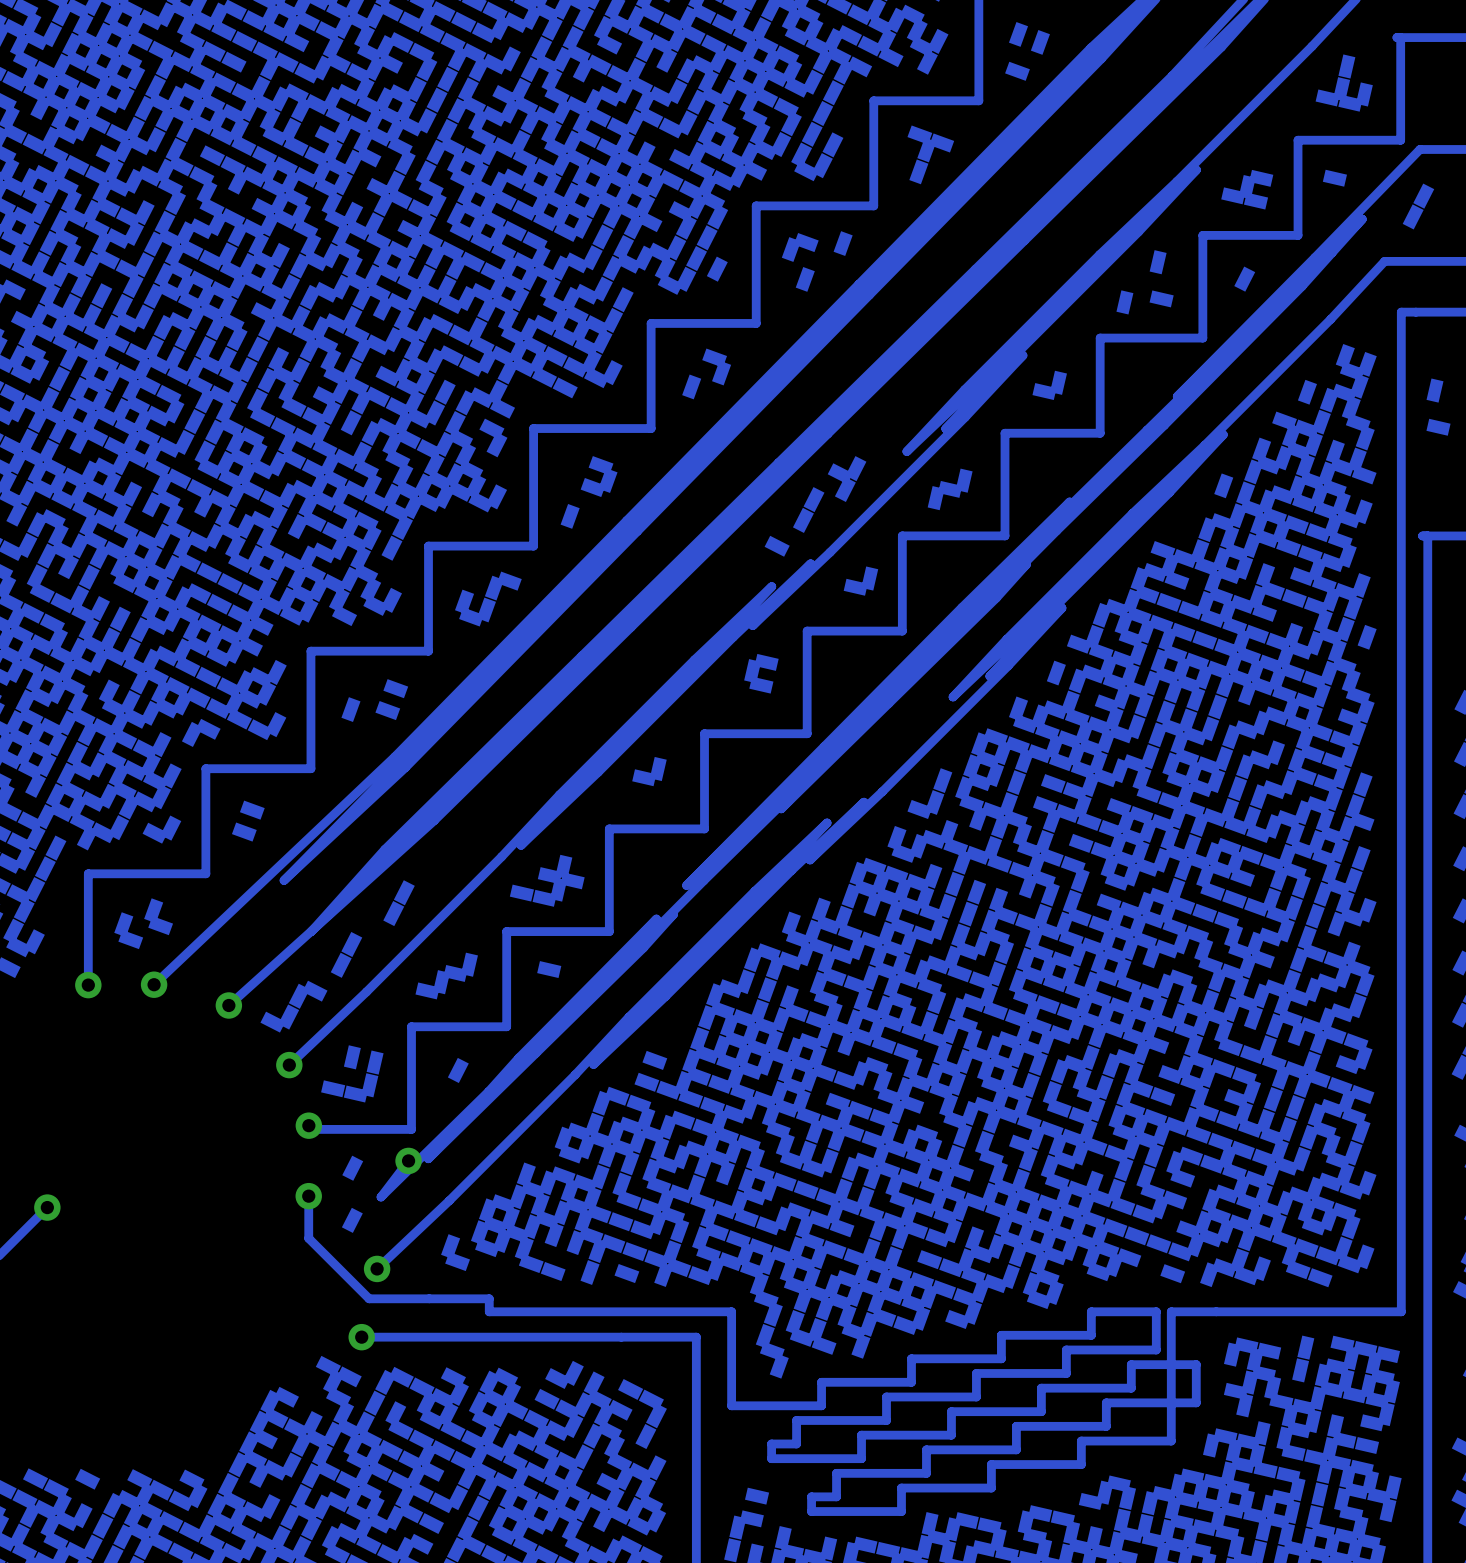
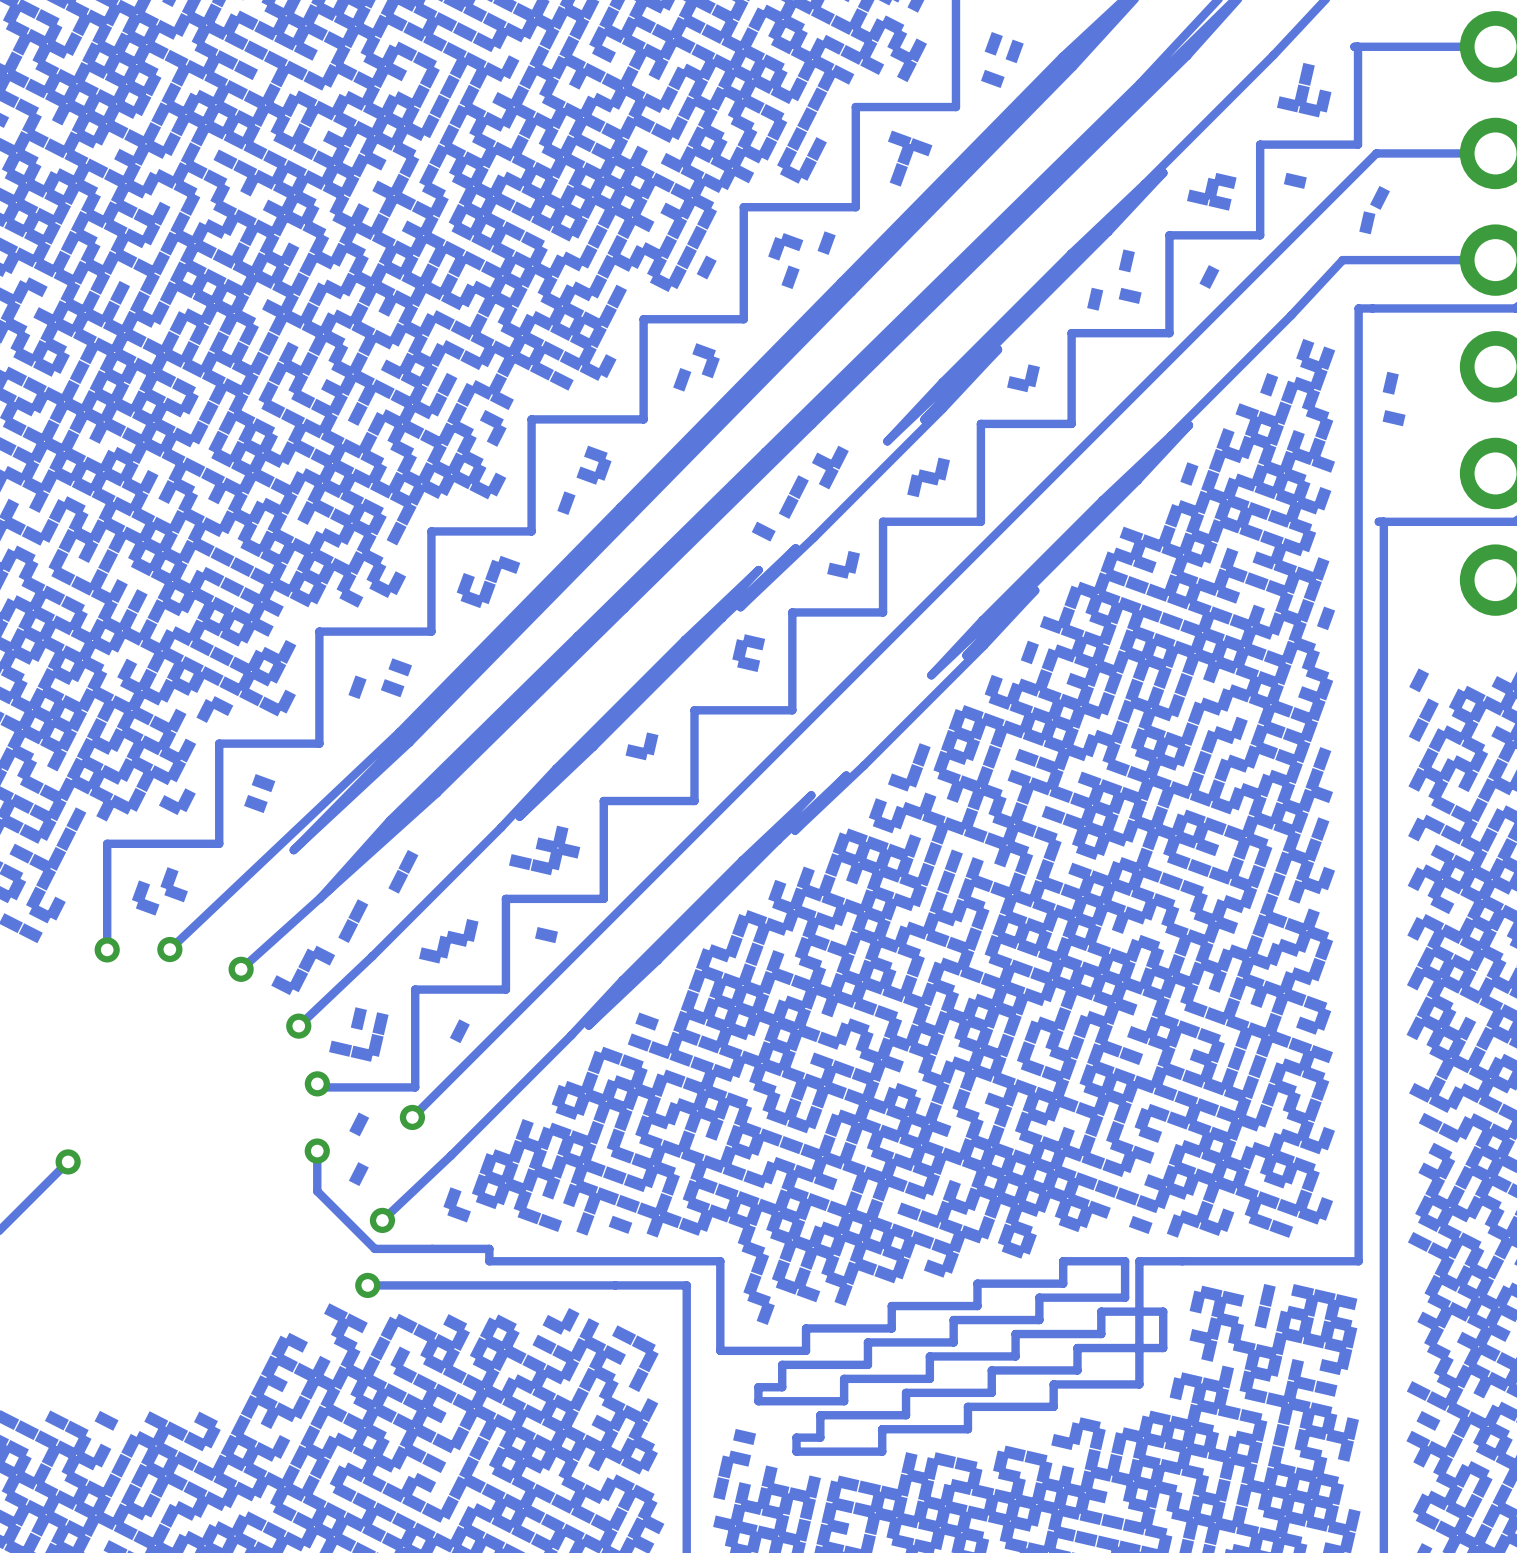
track: (1420, 149) (1177, 396) (1284, 291) (1254, 324) (1039, 535) (1069, 501) (962, 607) (686, 885) (931, 640) (901, 674) (764, 813) (733, 847) (949, 636) (979, 602) (871, 708) (1116, 463) (1086, 497) (1194, 391) (1224, 358) (1362, 219) (1302, 286) (918, 669) (1026, 564) (996, 597) (781, 808) (811, 775) (703, 880) (566, 1019) (673, 914) (643, 947) (428, 1158) (458, 1125) (596, 986) (656, 919) (518, 1058) (488, 1091) (381, 1197) (408, 1160) -> (1376, 153) (412, 1117)
drawing shape: [1402, 204, 1424, 230] -> [1359, 211, 1376, 235]

